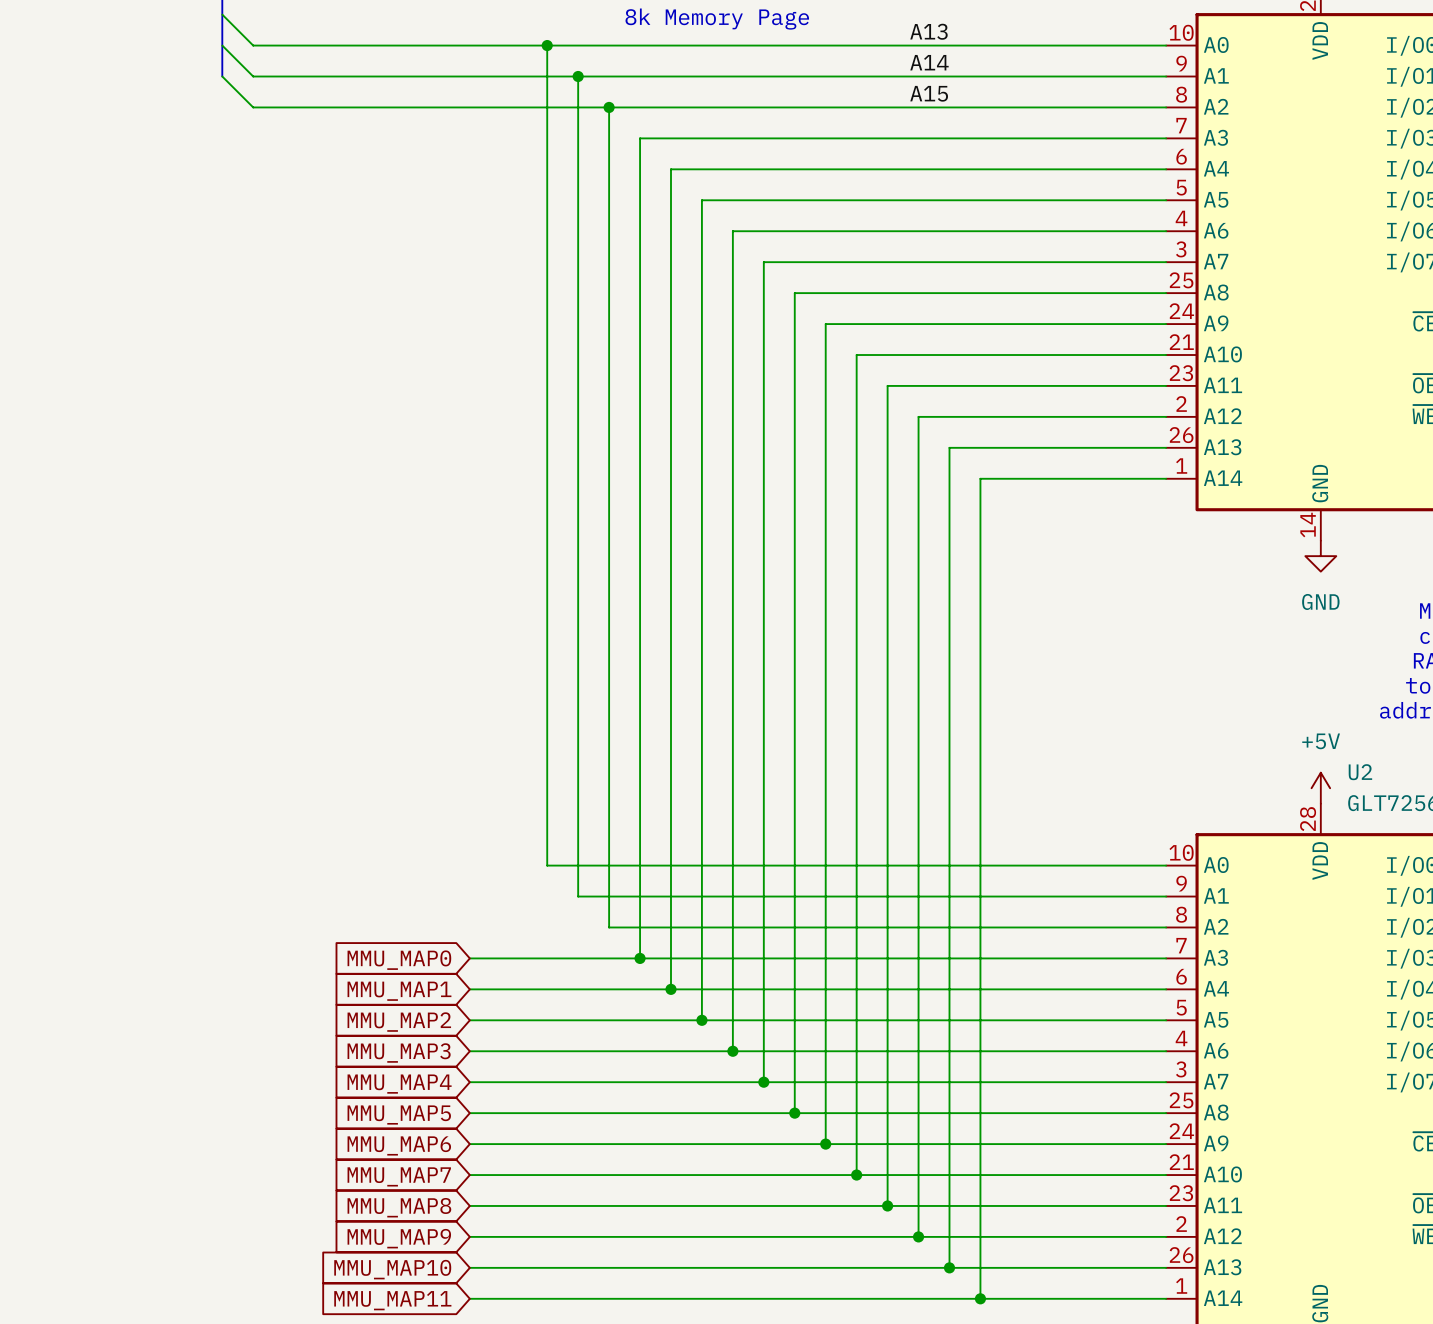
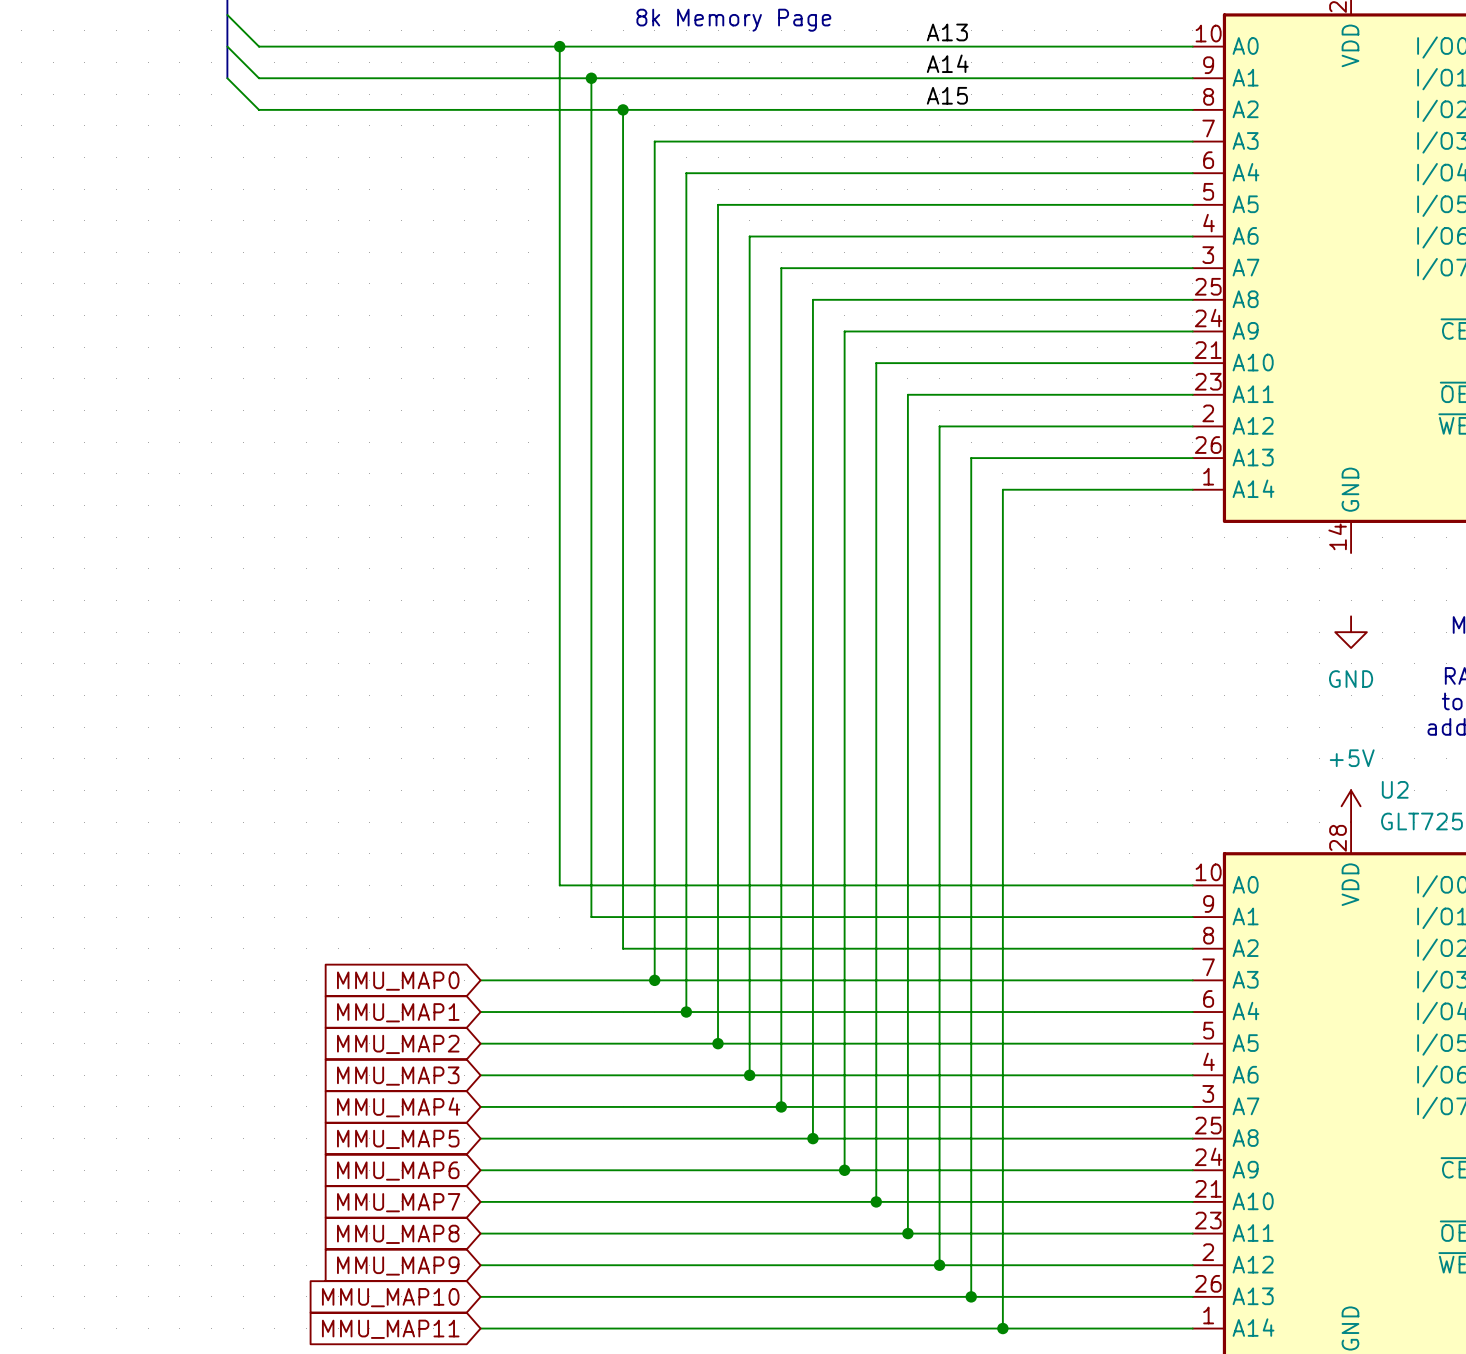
power symbol position: GND (1320, 556) -> GND (1351, 632)

